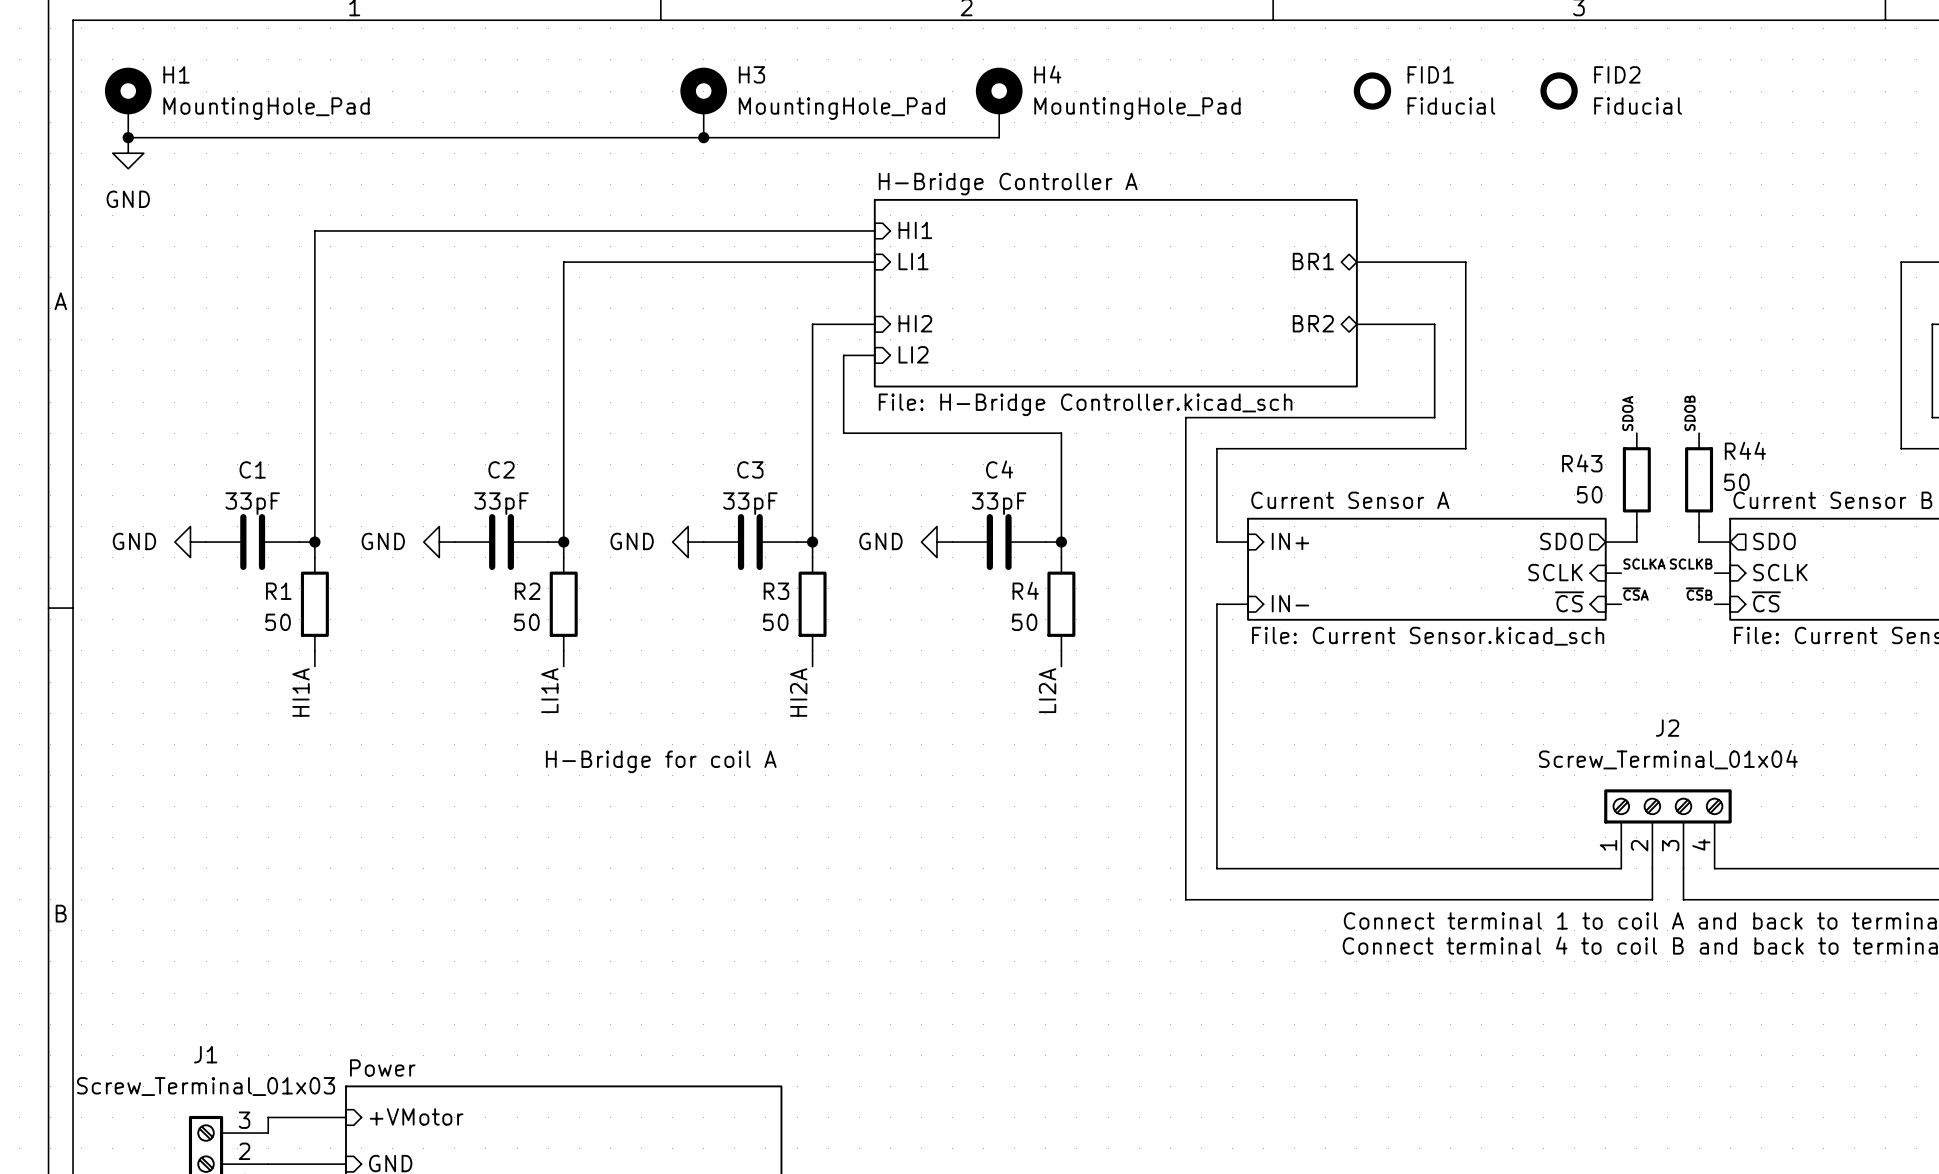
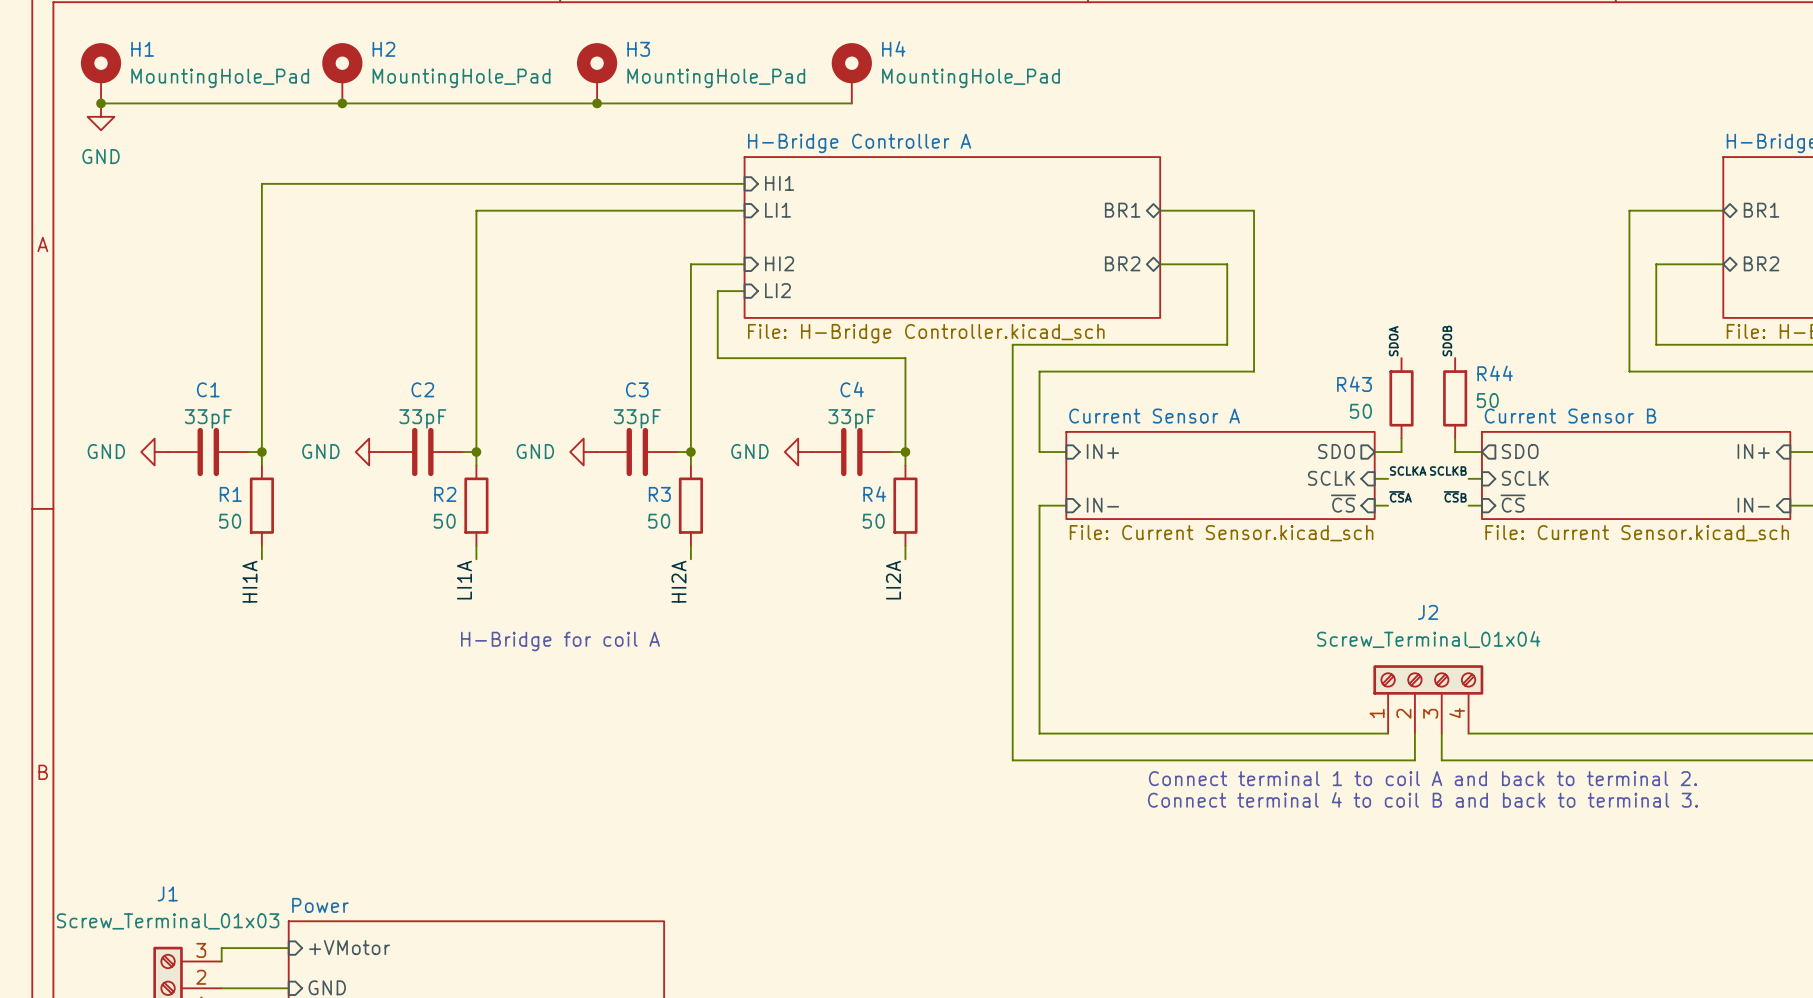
FID1: Fiducial (1372, 91) -> none
FID2: Fiducial (1559, 91) -> none
H2: none -> MountingHole_Pad (342, 73)
junction: none -> (342, 103)

